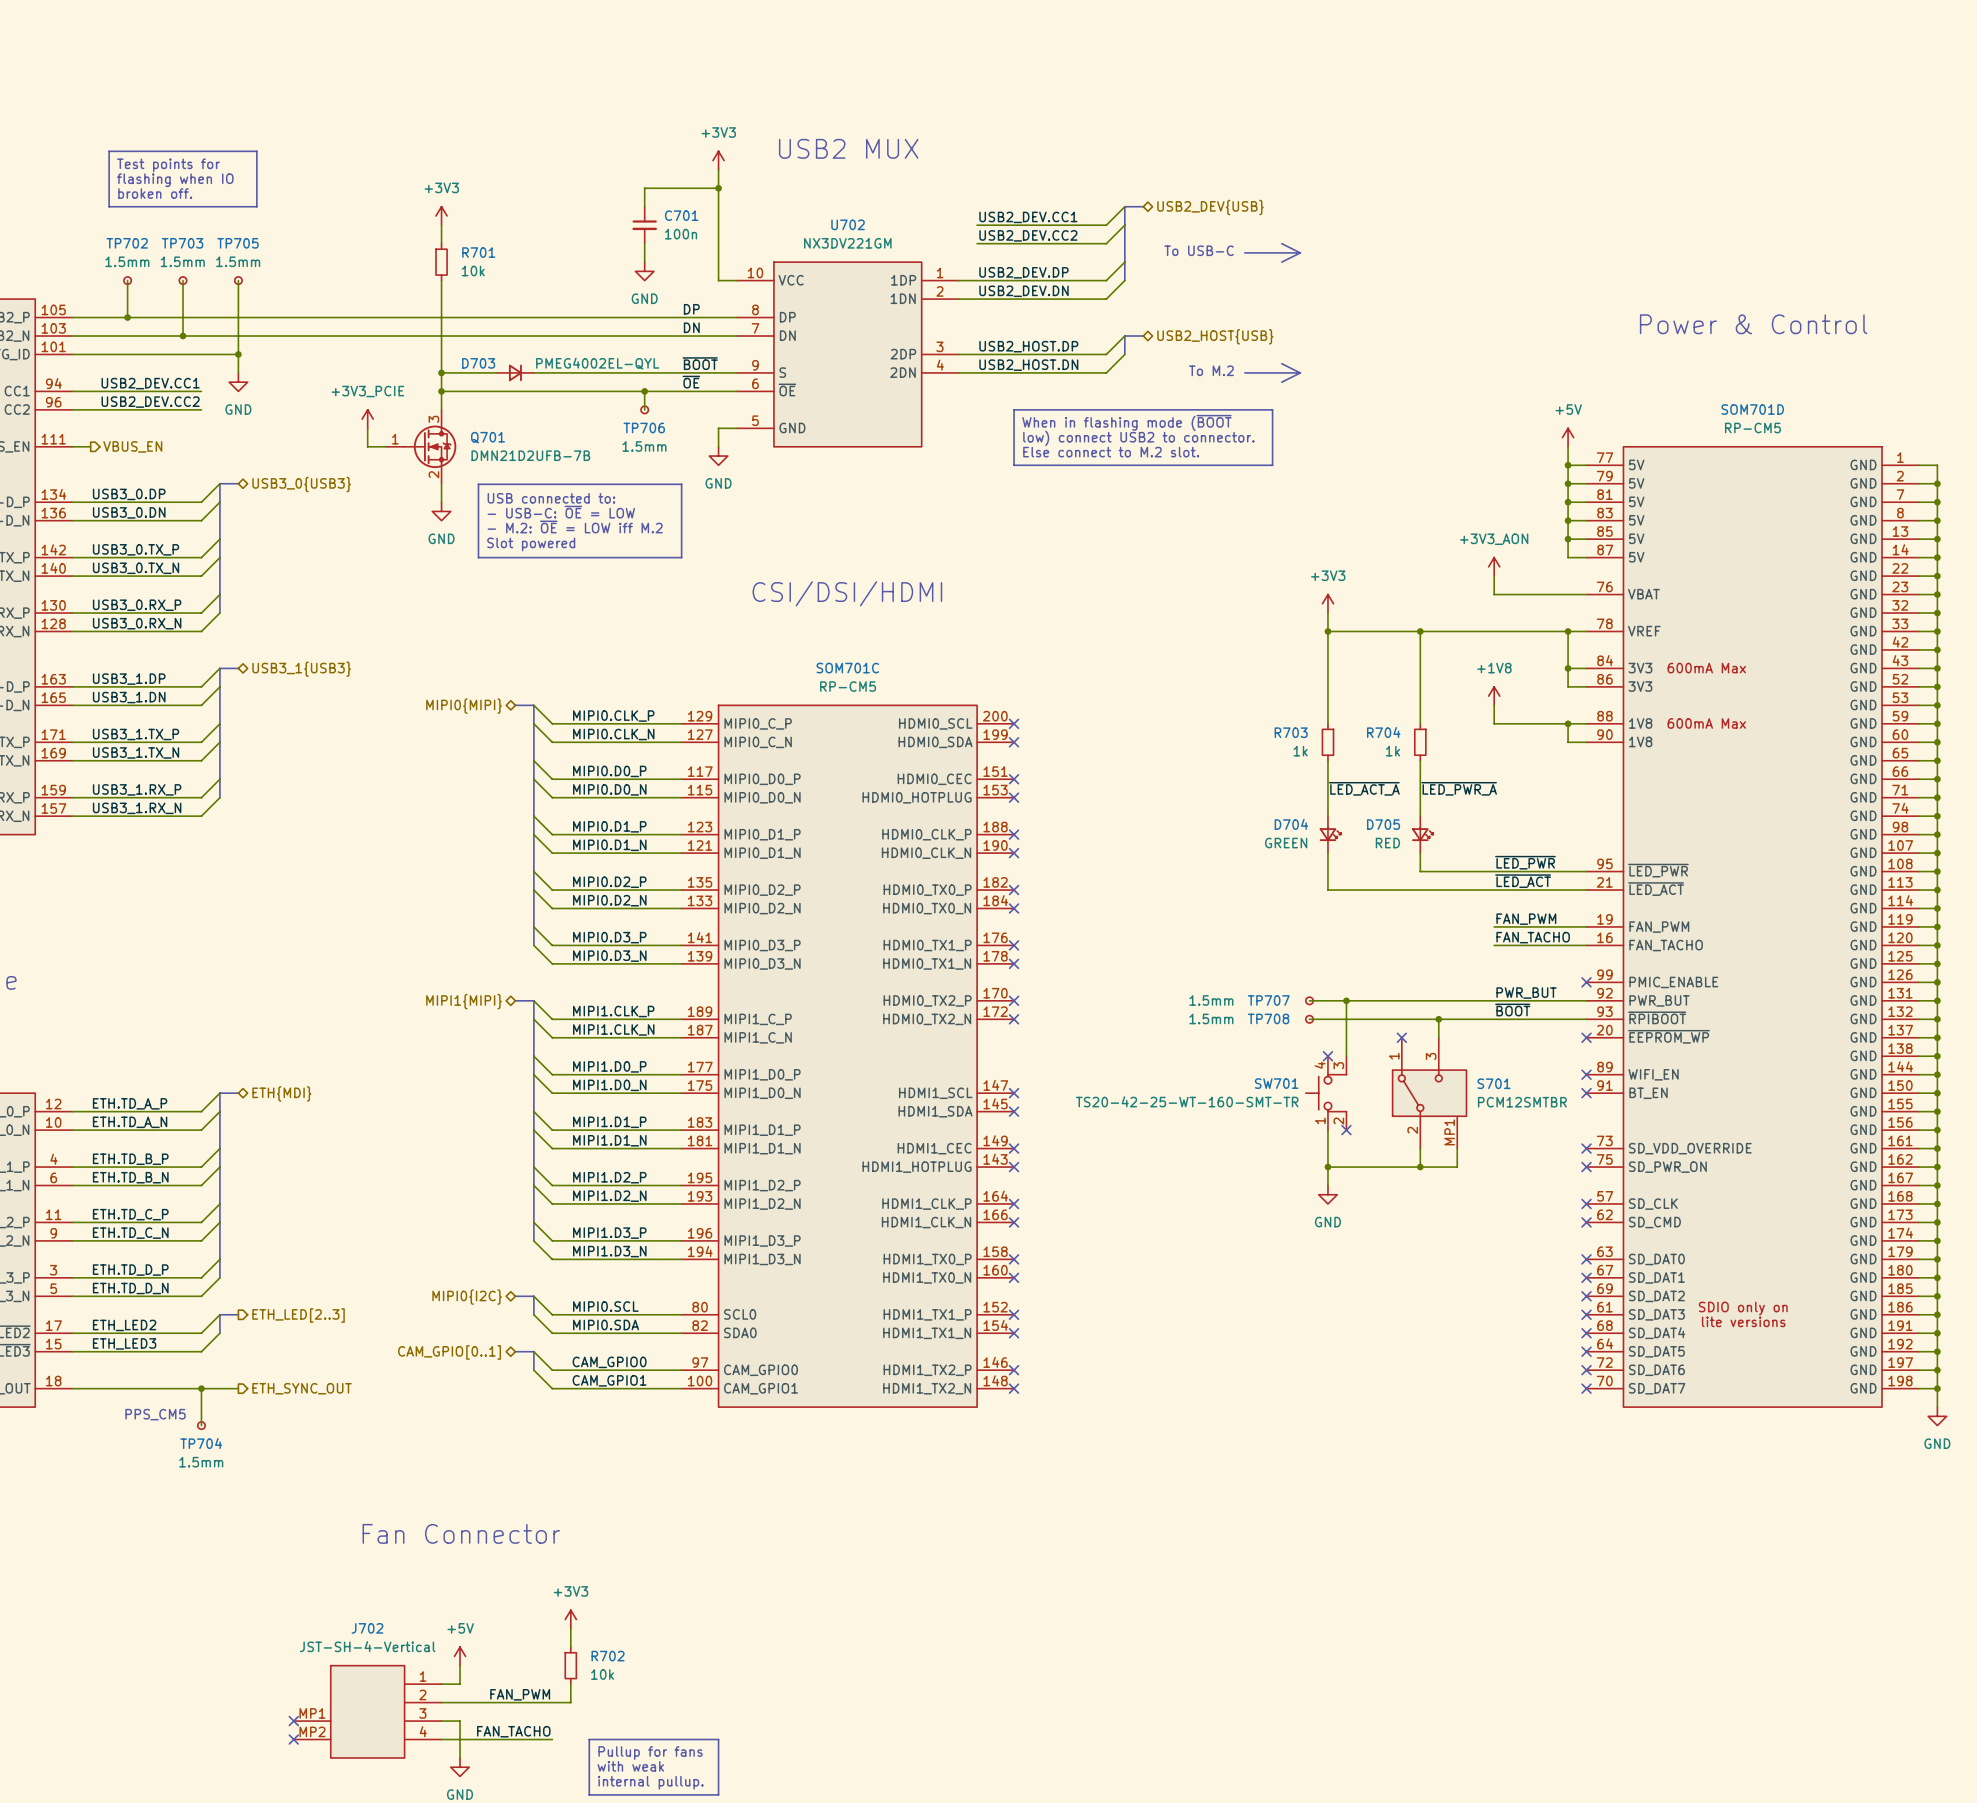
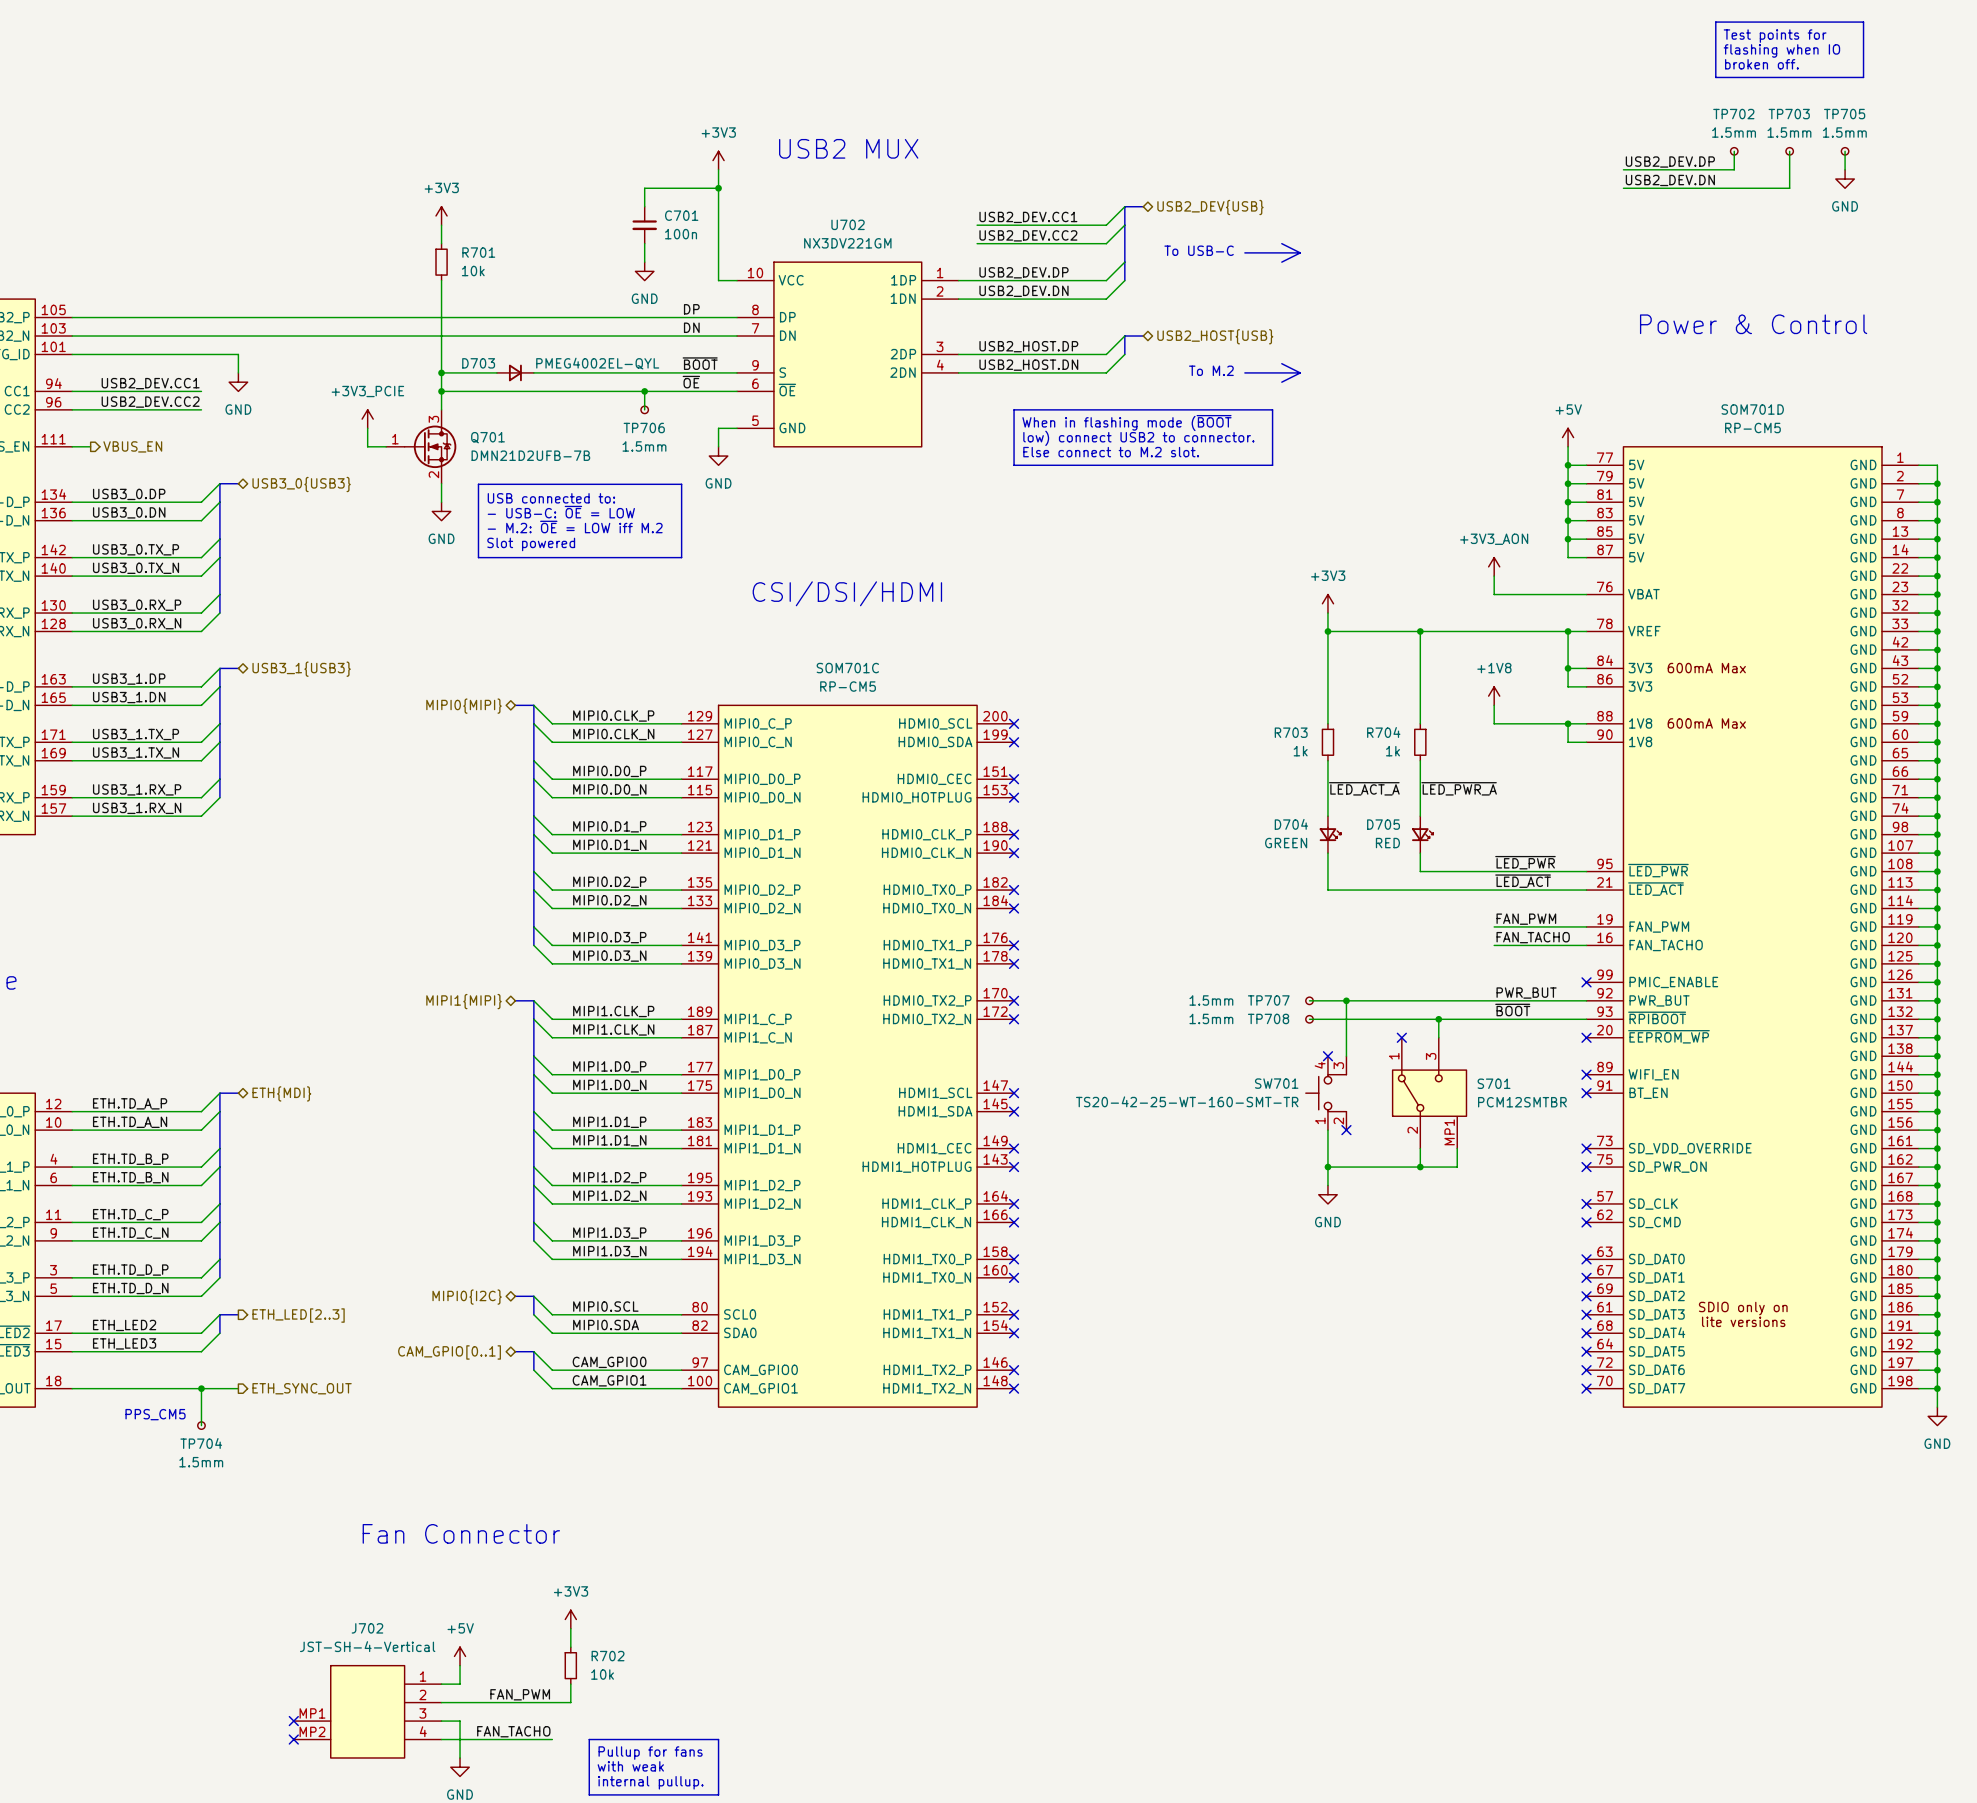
line: none -> (1715, 22) (1863, 22) (1863, 77) (1715, 77) (1715, 22)
text: none -> Test points for (1775, 36)
text: none -> flashing when IO (1781, 50)
text: none -> broken off. (1761, 64)
line: (109, 151) (256, 151) (256, 206) (109, 206) (109, 151) -> none
wire: none -> (1734, 151) (1734, 169) (1623, 169)
wire: none -> (1789, 151) (1789, 188) (1623, 188)
wire: none -> (1845, 151) (1845, 169)
label: none -> USB2_DEV.DP (1670, 162)
text: Test points for (168, 165) -> none
power symbol: none -> GND (1845, 179)
text: flashing when IO (175, 180) -> none
label: none -> USB2_DEV.DN (1670, 180)
text: broken off. (155, 193) -> none
wire: (127, 280) (127, 317) -> none
TP702 position: (127, 280) -> (1734, 151)
wire: (183, 280) (183, 336) -> none
TP703 position: (183, 280) -> (1789, 151)
wire: (238, 280) (238, 354) -> none
TP705 position: (238, 280) -> (1845, 151)
junction: (127, 317) -> none
junction: (183, 336) -> none
junction: (238, 354) -> none

